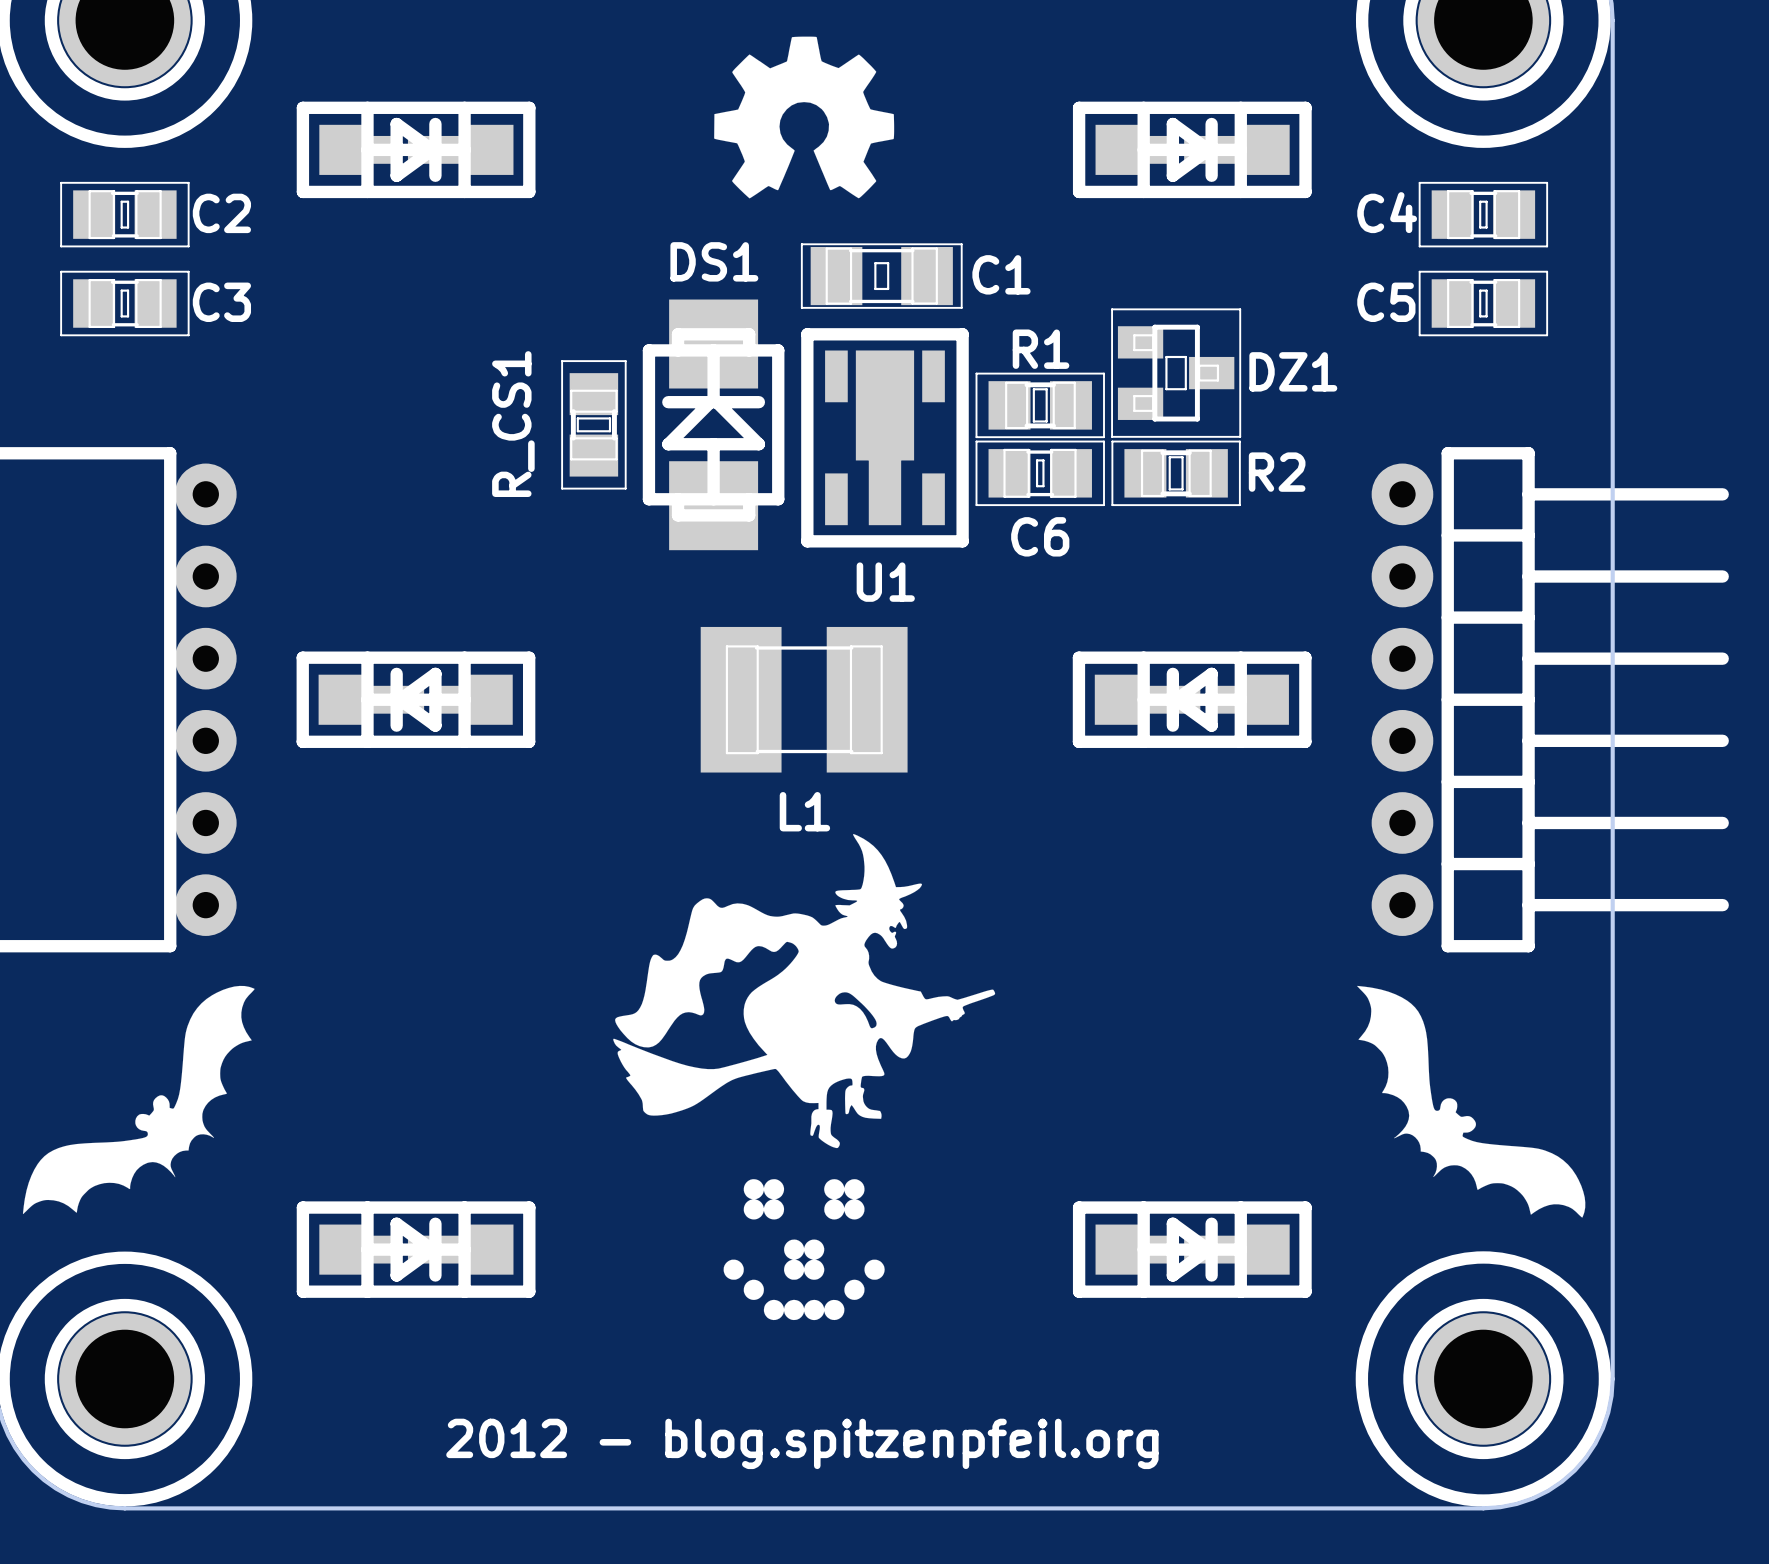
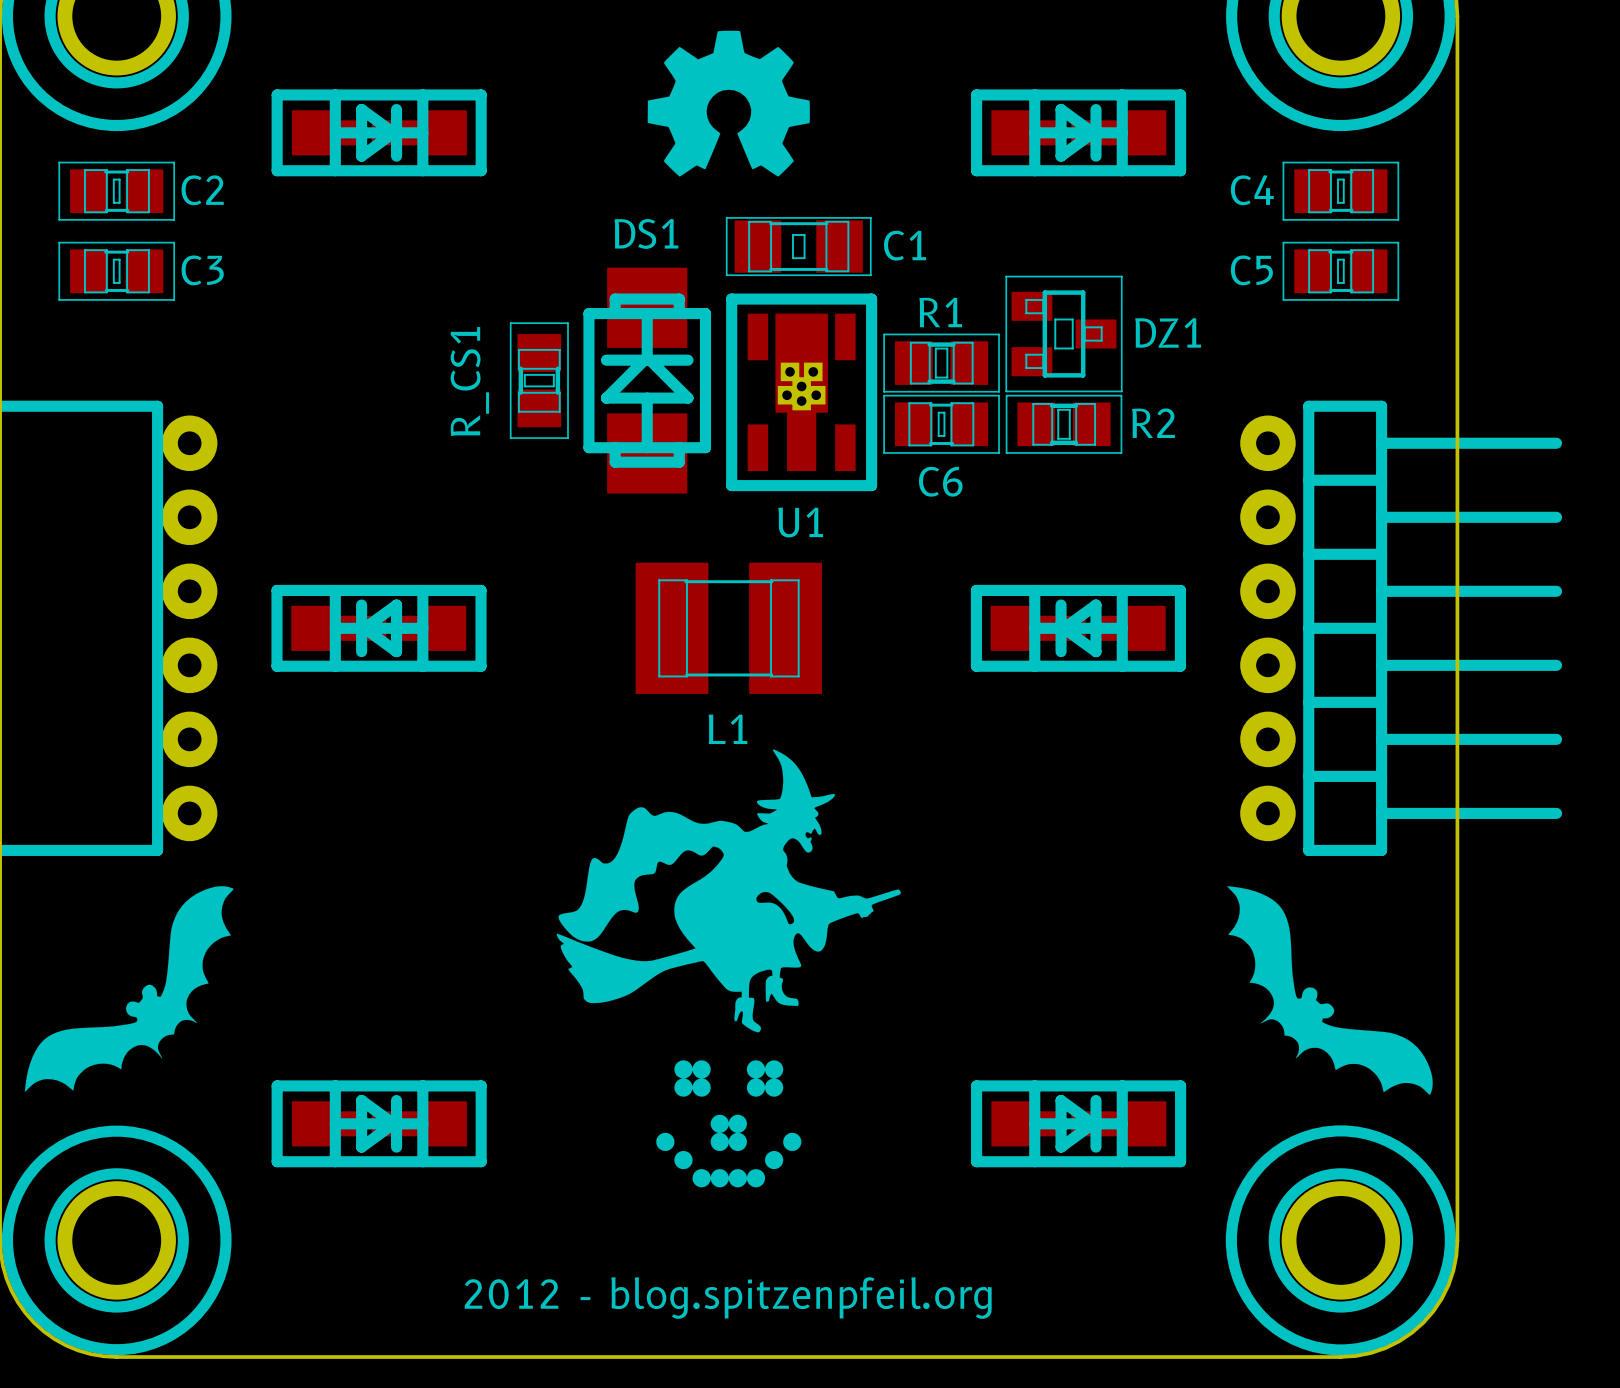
U1 footprint: [801, 328, 969, 548] -> [726, 293, 878, 492]

